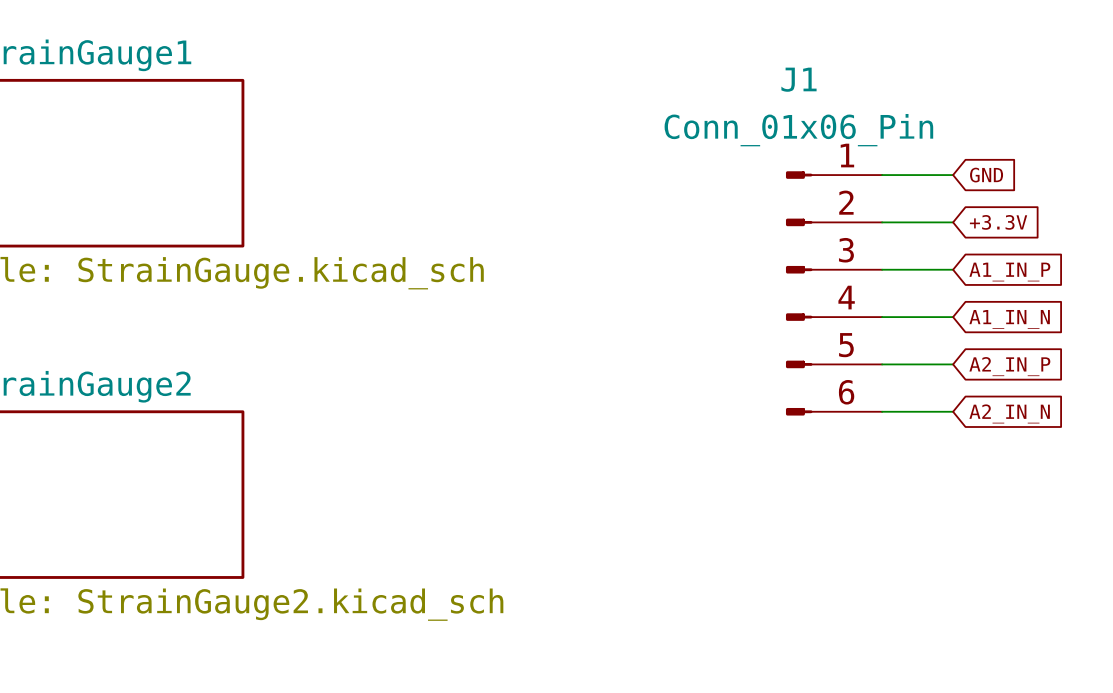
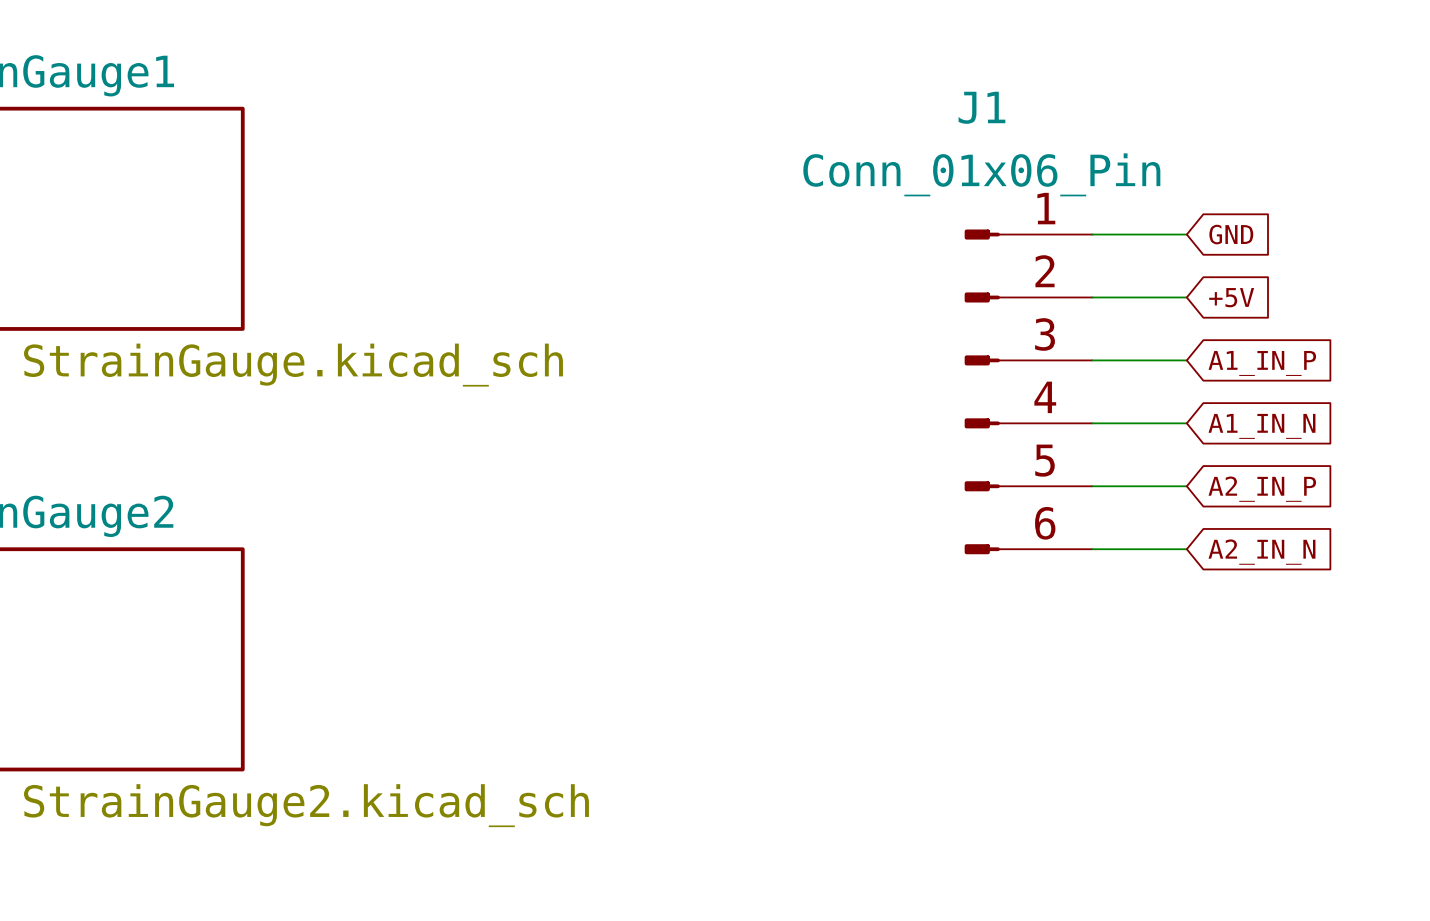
global label: +3.3V (998, 222) -> +5V (1231, 297)

